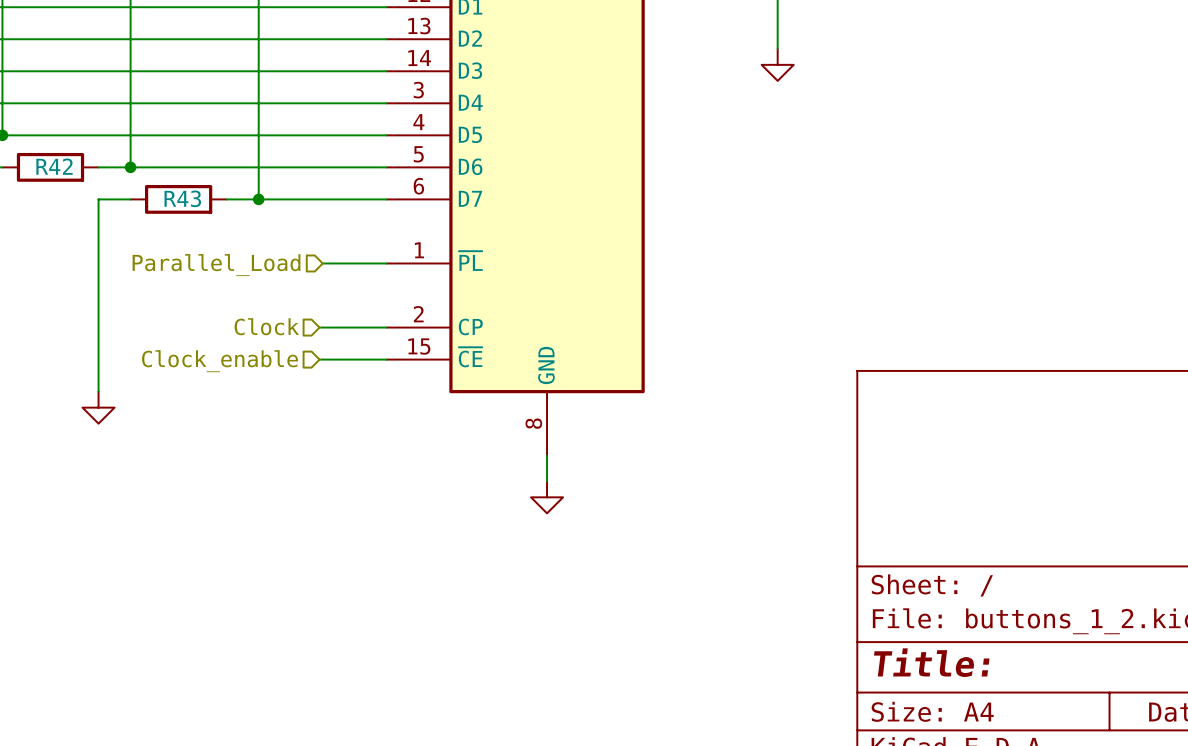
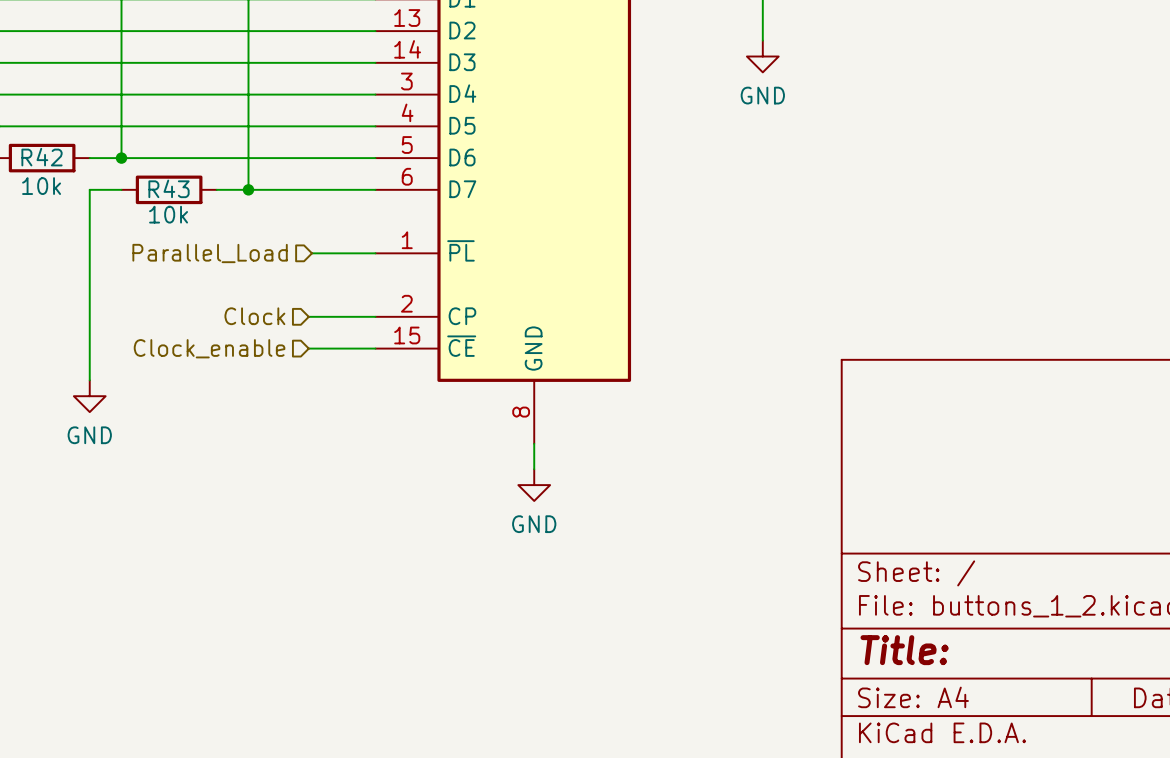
power symbol text: none -> GND (762, 95)
R42 value: none -> 10k (41, 186)
R43 value: none -> 10k (168, 214)
power symbol text: none -> GND (89, 435)
power symbol text: none -> GND (534, 524)

